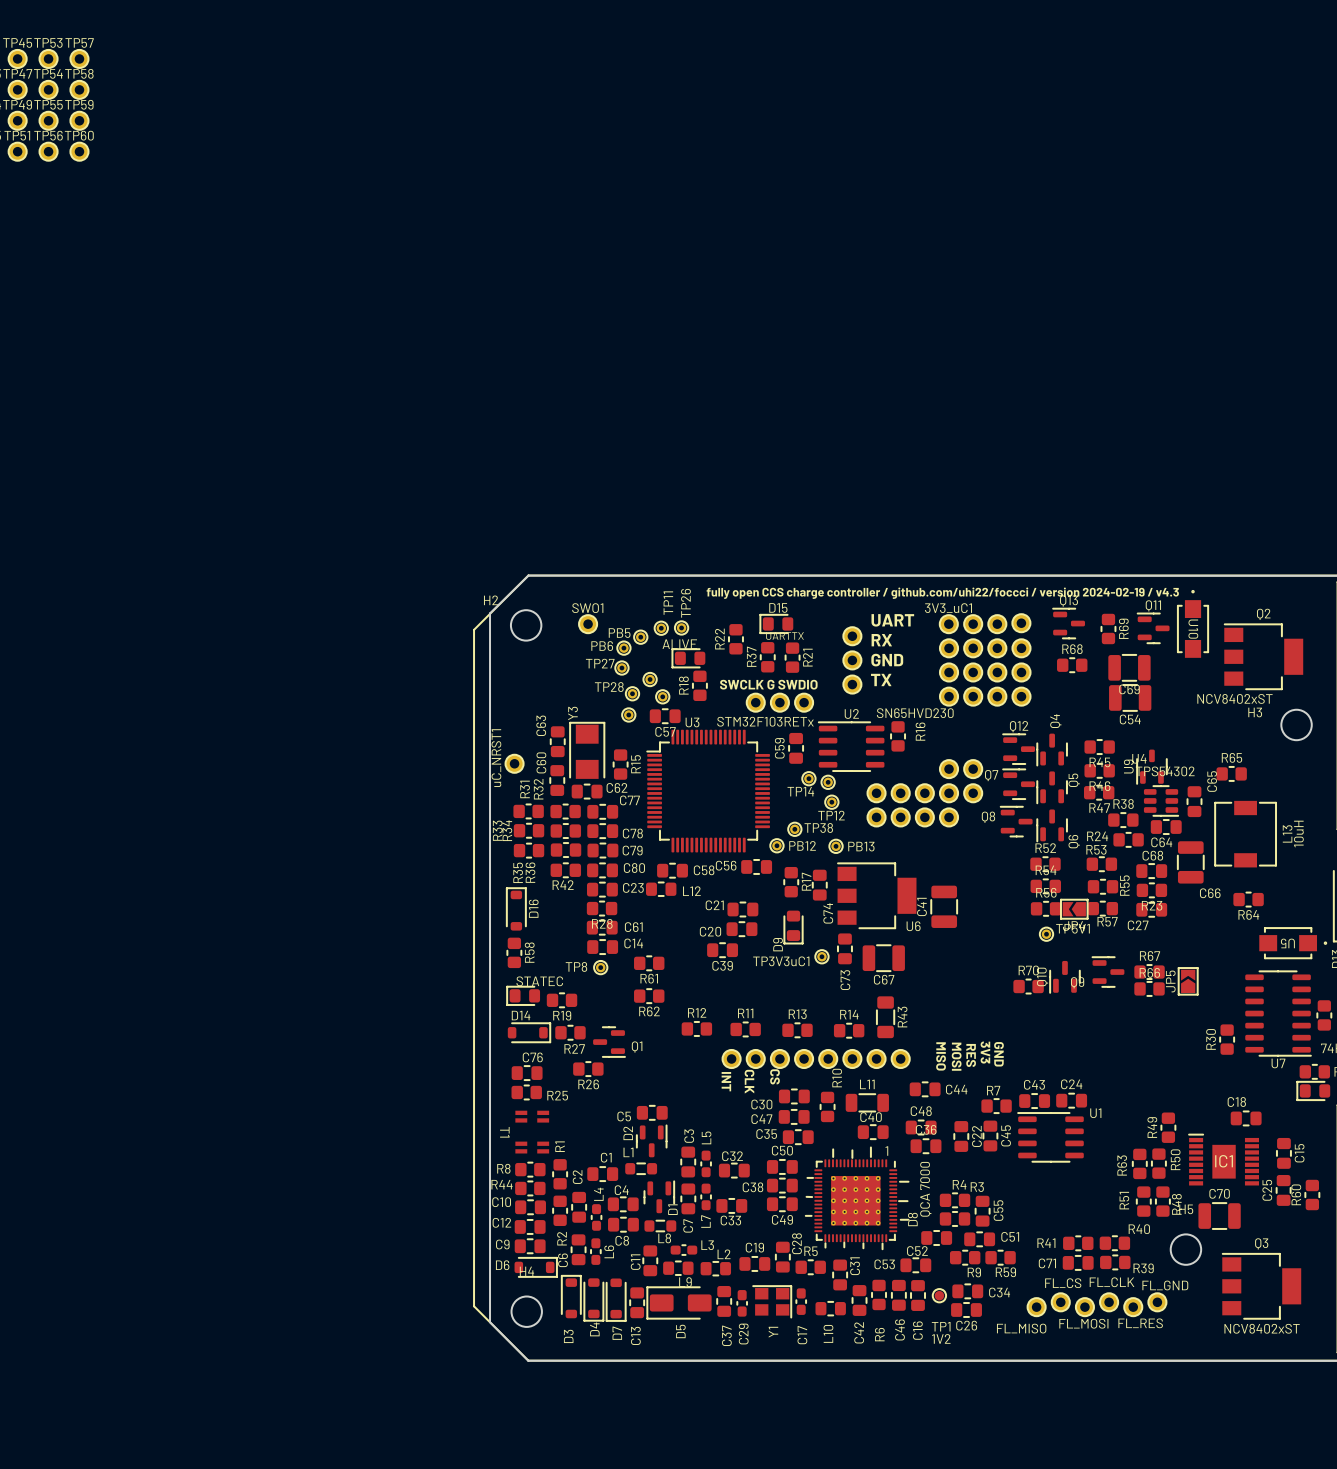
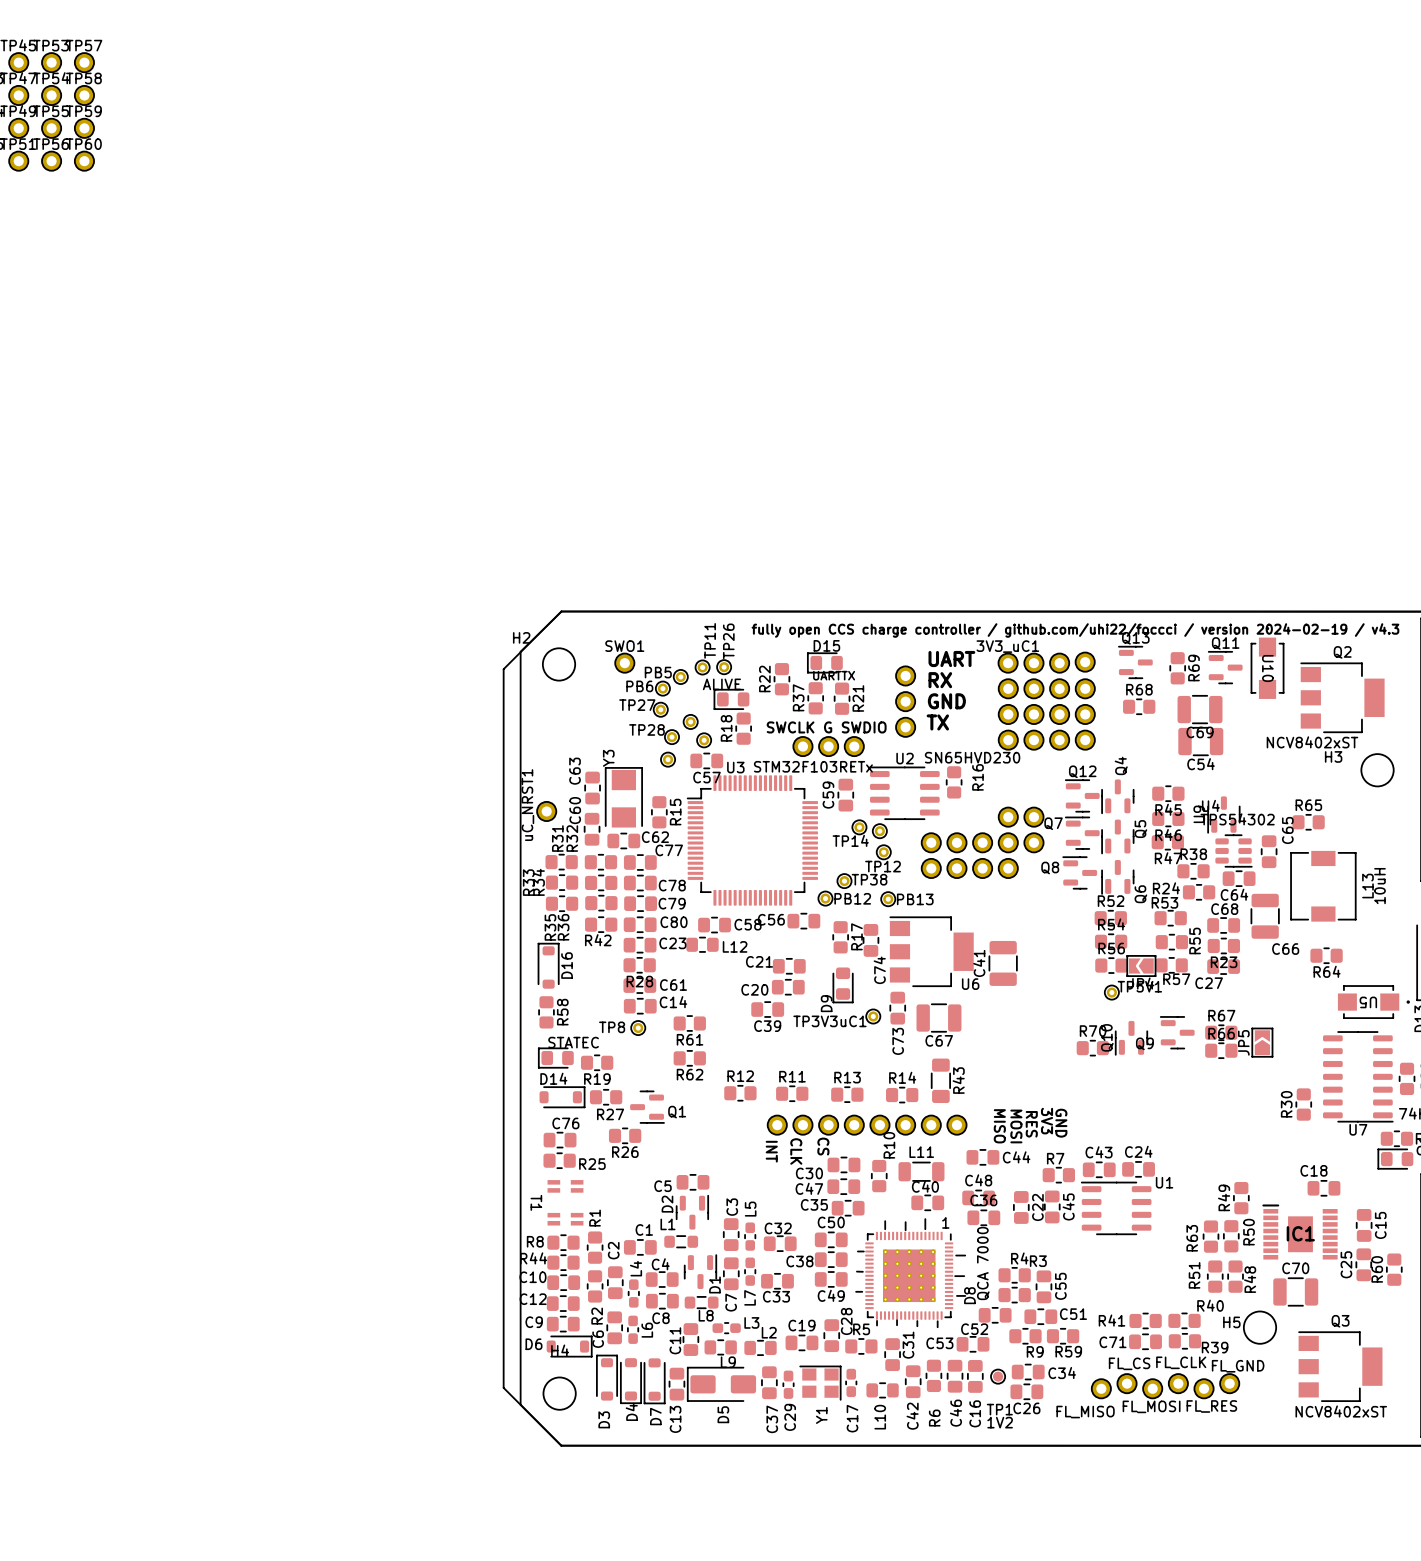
H5 name position: H5 (1186, 1209) -> H5 (1231, 1322)

